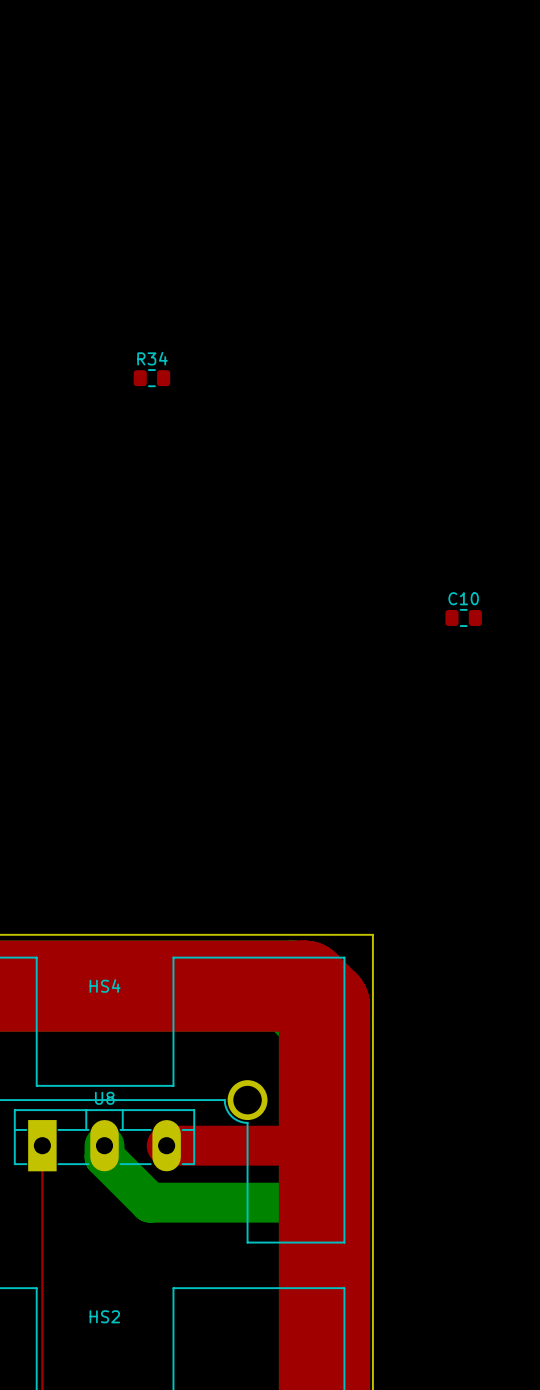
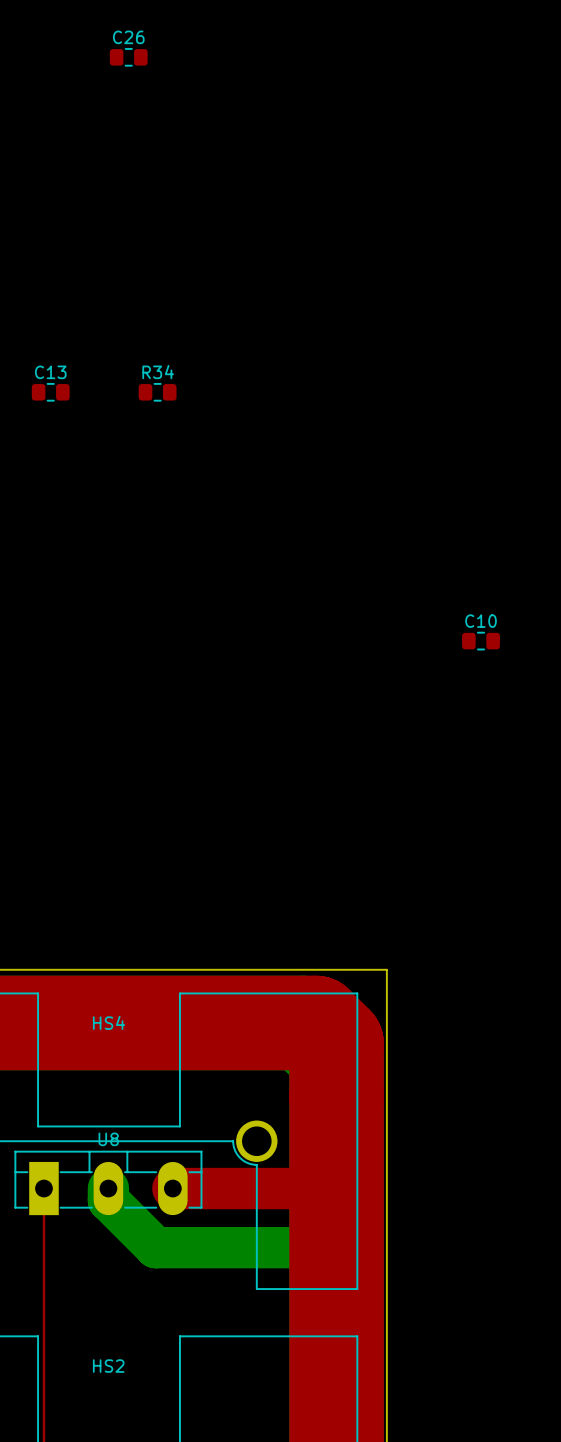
C26: none -> (128, 57)
C13: none -> (50, 392)

